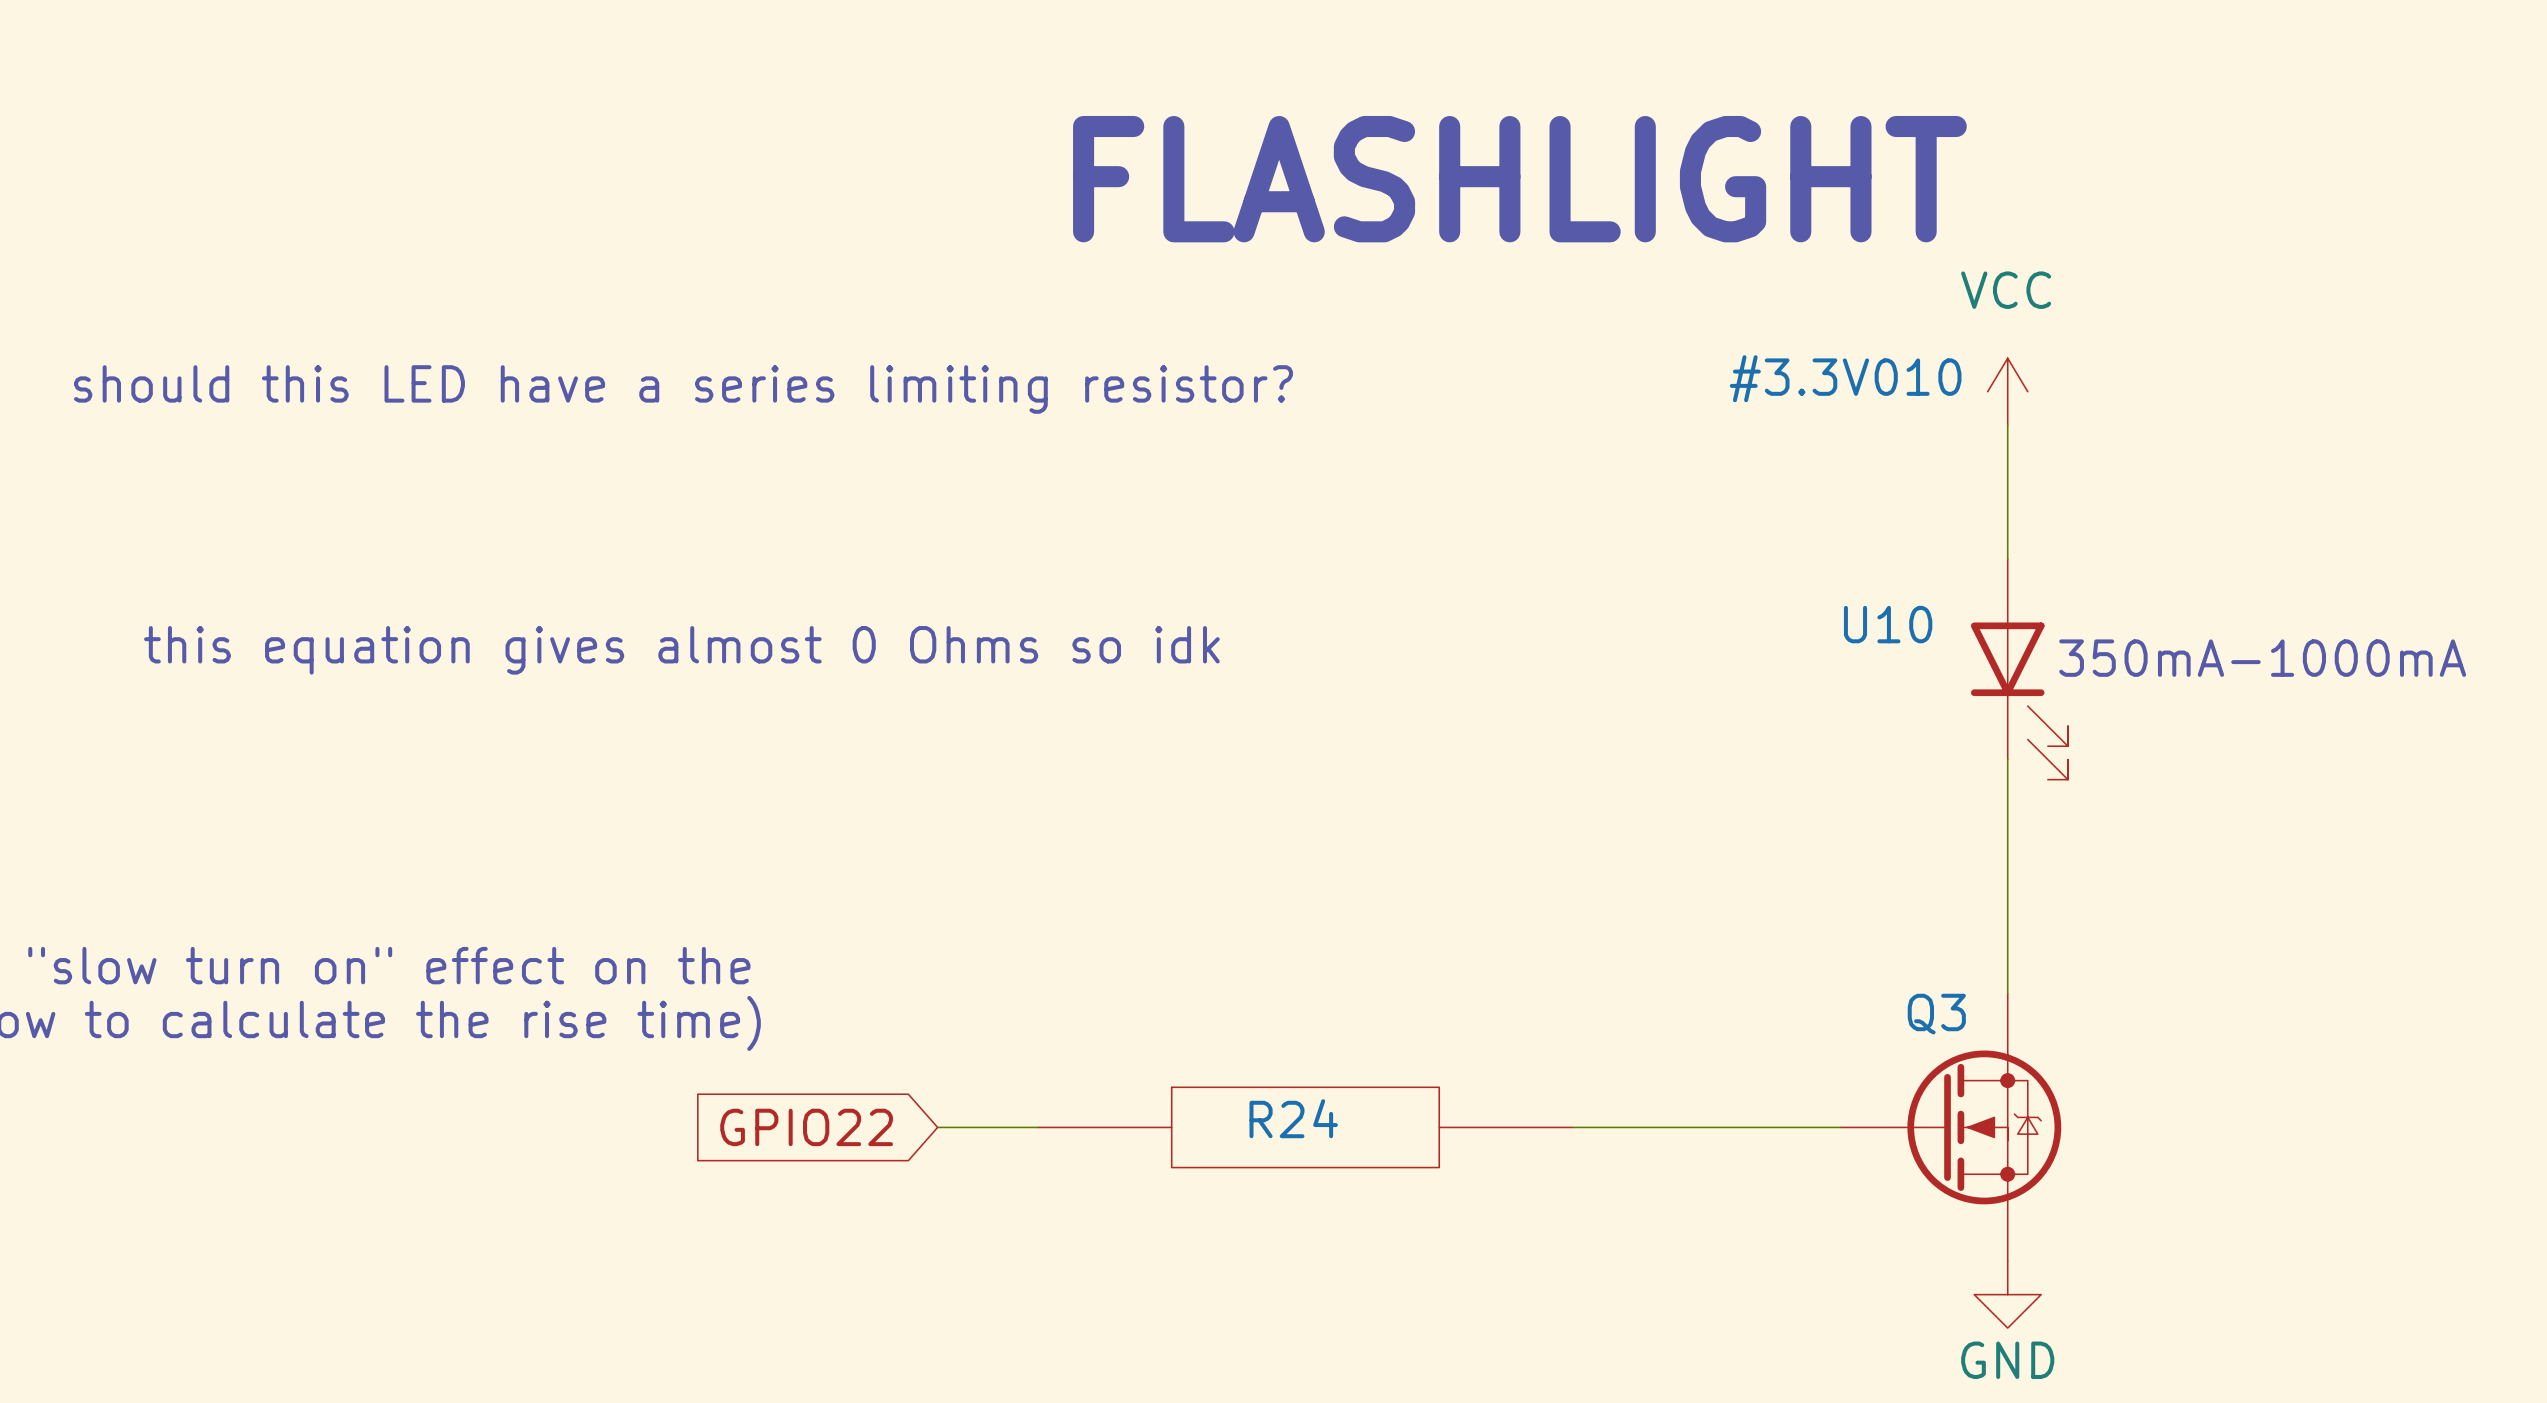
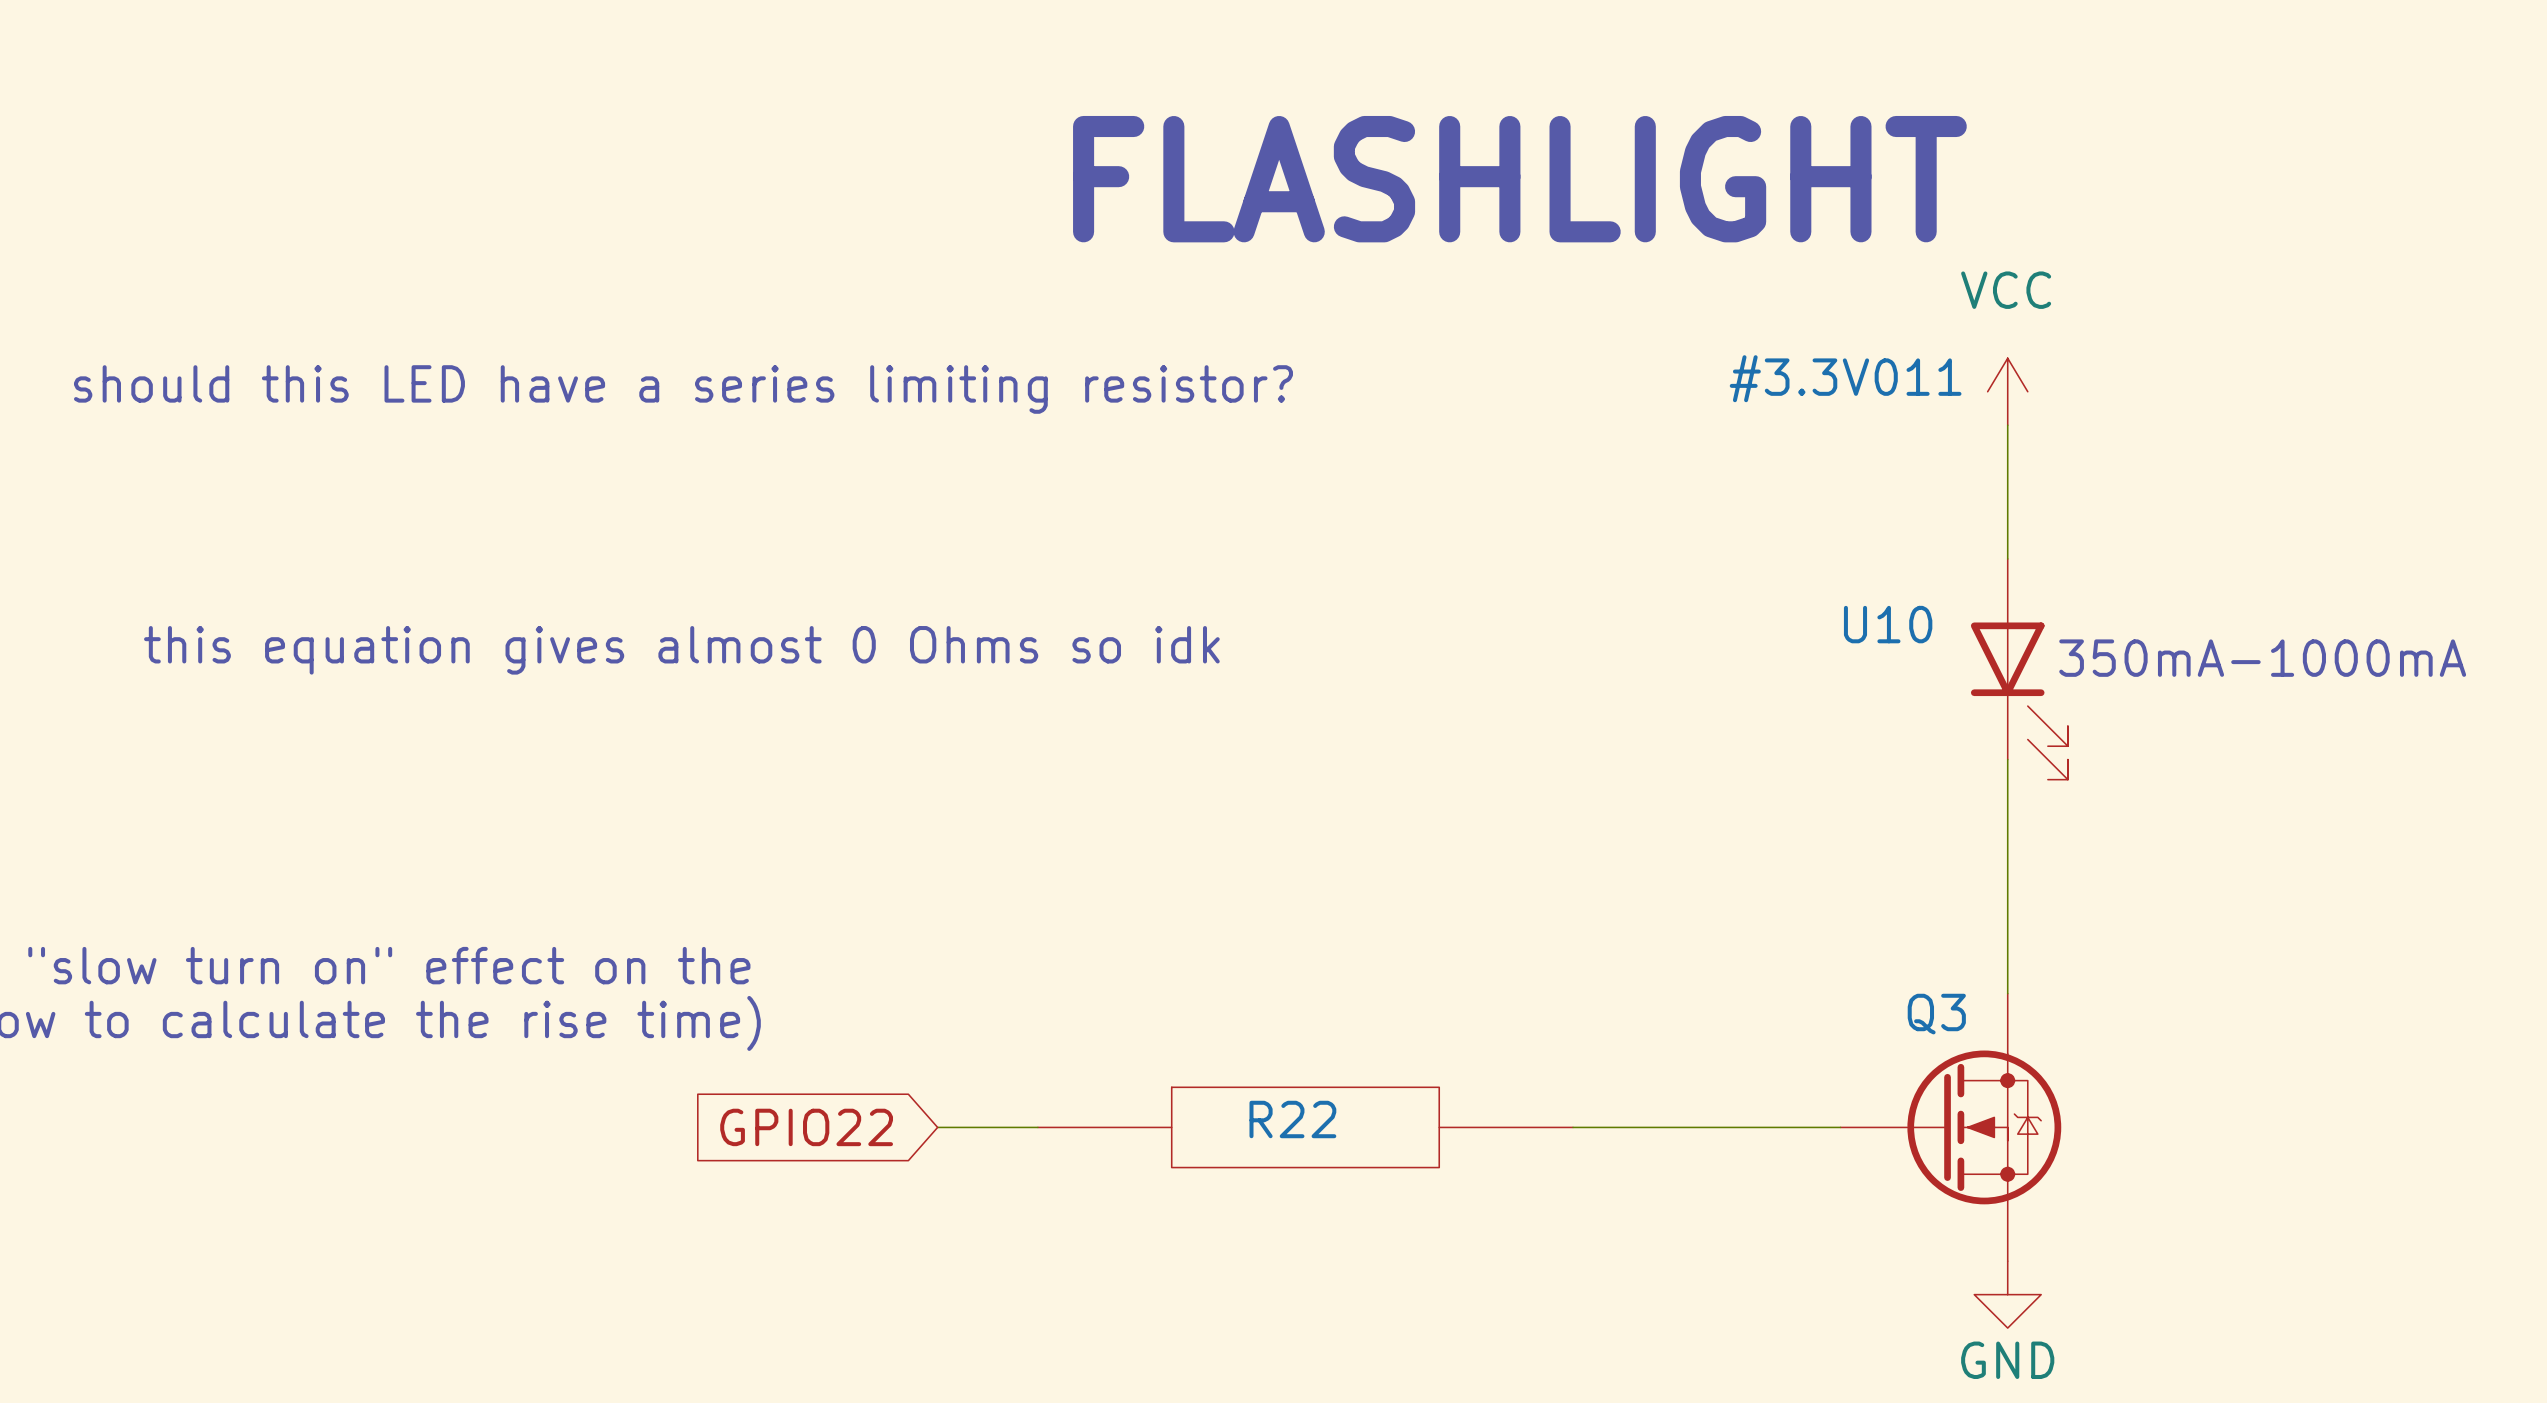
#3.3V010 name: #3.3V010 (1845, 378) -> #3.3V011 (1845, 378)
R24 name: R24 (1293, 1118) -> R22 (1292, 1119)

